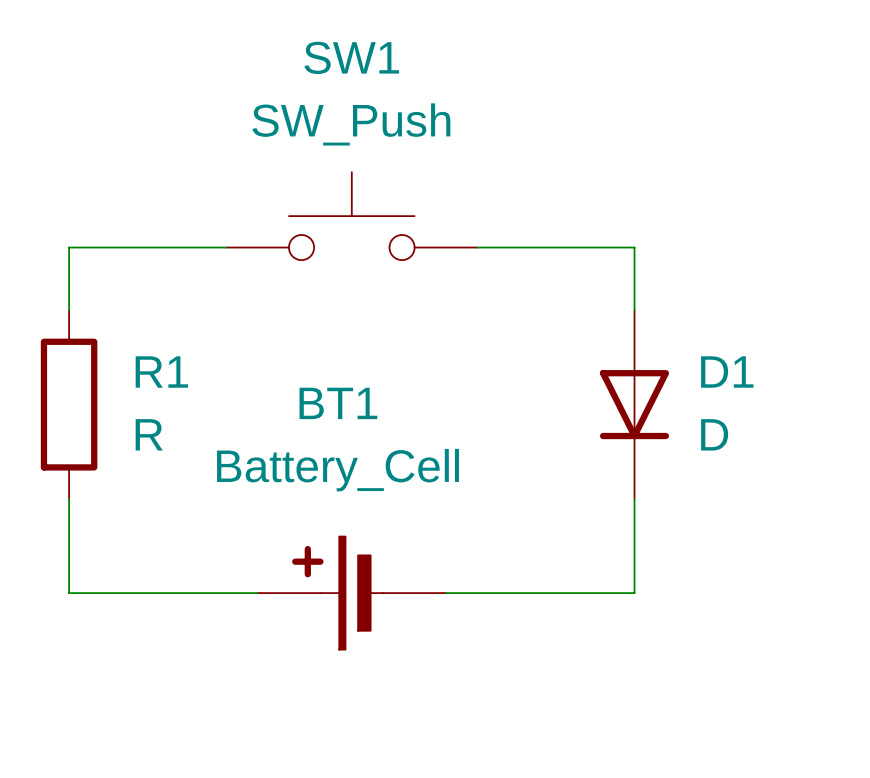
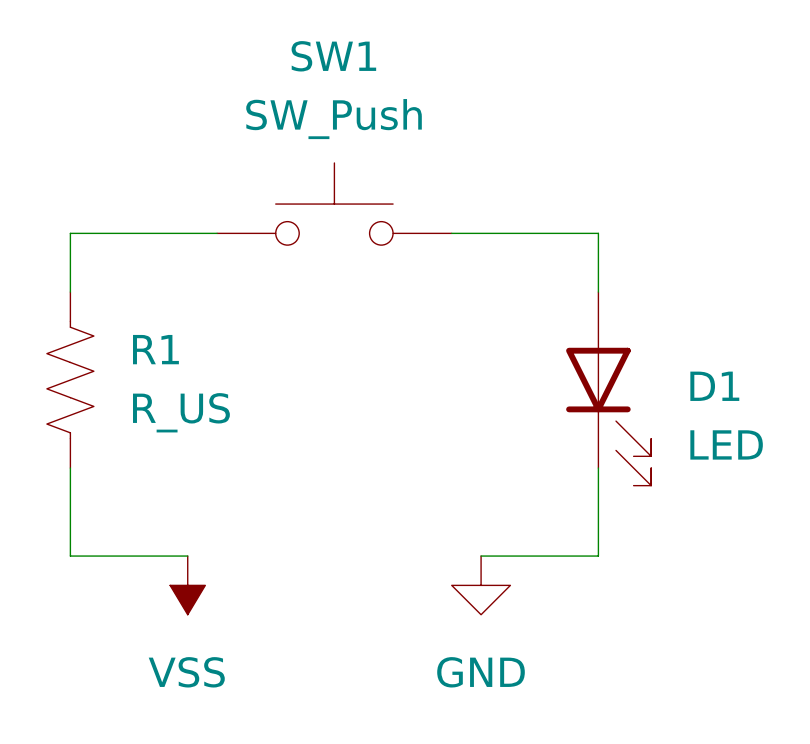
R1 symbol: [40, 310, 98, 499] -> [46, 292, 94, 469]
D1 symbol: [599, 310, 670, 499] -> [566, 292, 652, 486]
R1 value: R (149, 434) -> R_US (181, 412)
D1 value: D (714, 434) -> LED (726, 444)
wire: (194, 593) (257, 593) -> none
BT1: Battery_Cell (351, 593) -> none
wire: (446, 593) (508, 593) -> none
power symbol: none -> VSS (187, 585)
power symbol: none -> GND (481, 585)

